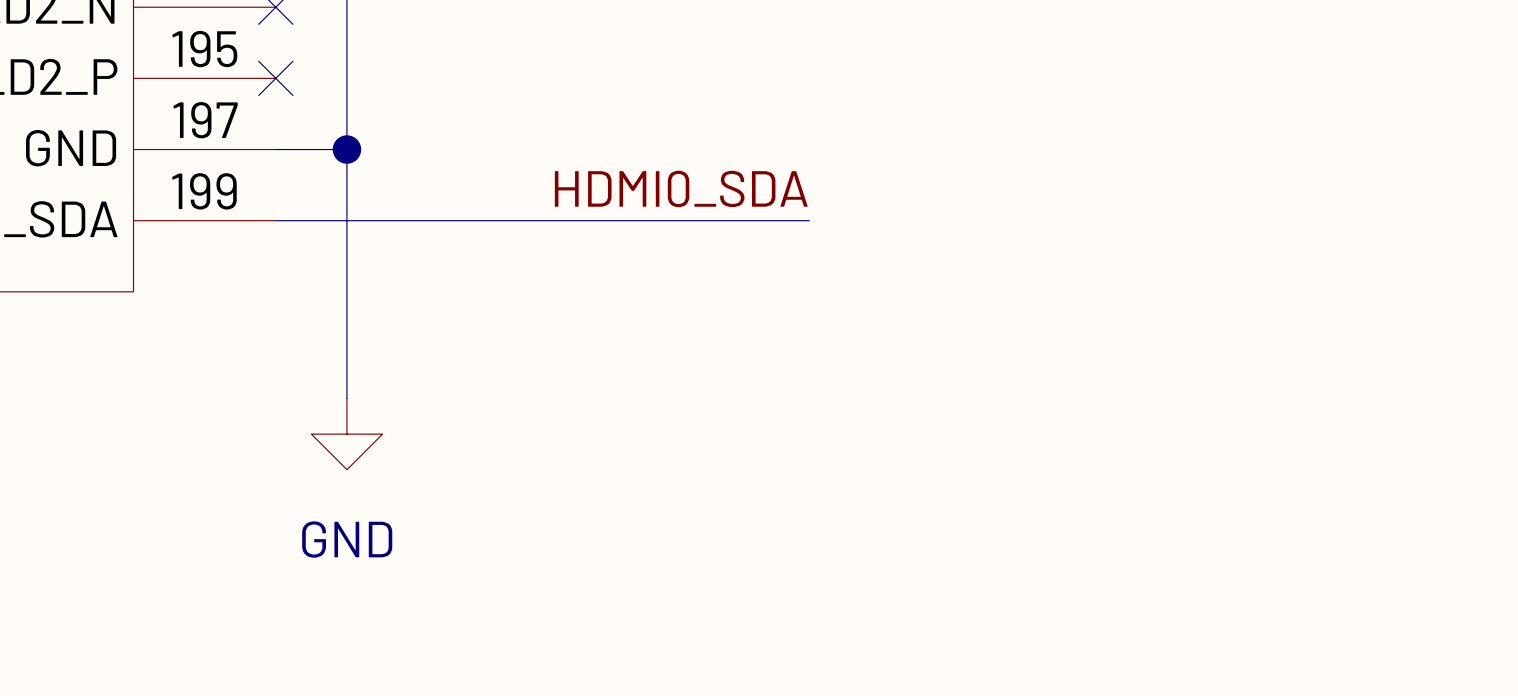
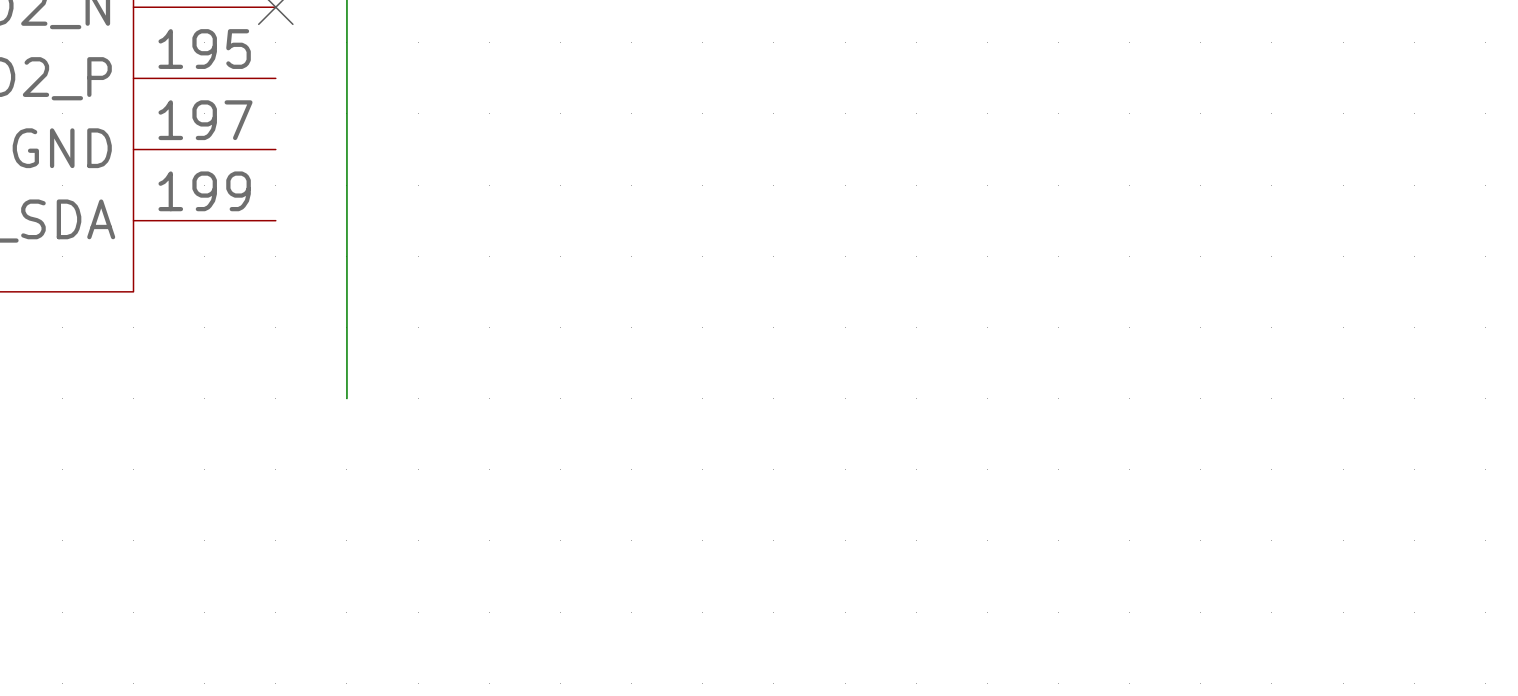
no-connect mark: (275, 78) -> none
wire: (275, 149) (346, 149) -> none
junction: (346, 149) -> none
label: HDMI0_SDA (681, 188) -> none
wire: (275, 220) (809, 220) -> none
power symbol: GND (346, 434) -> none

